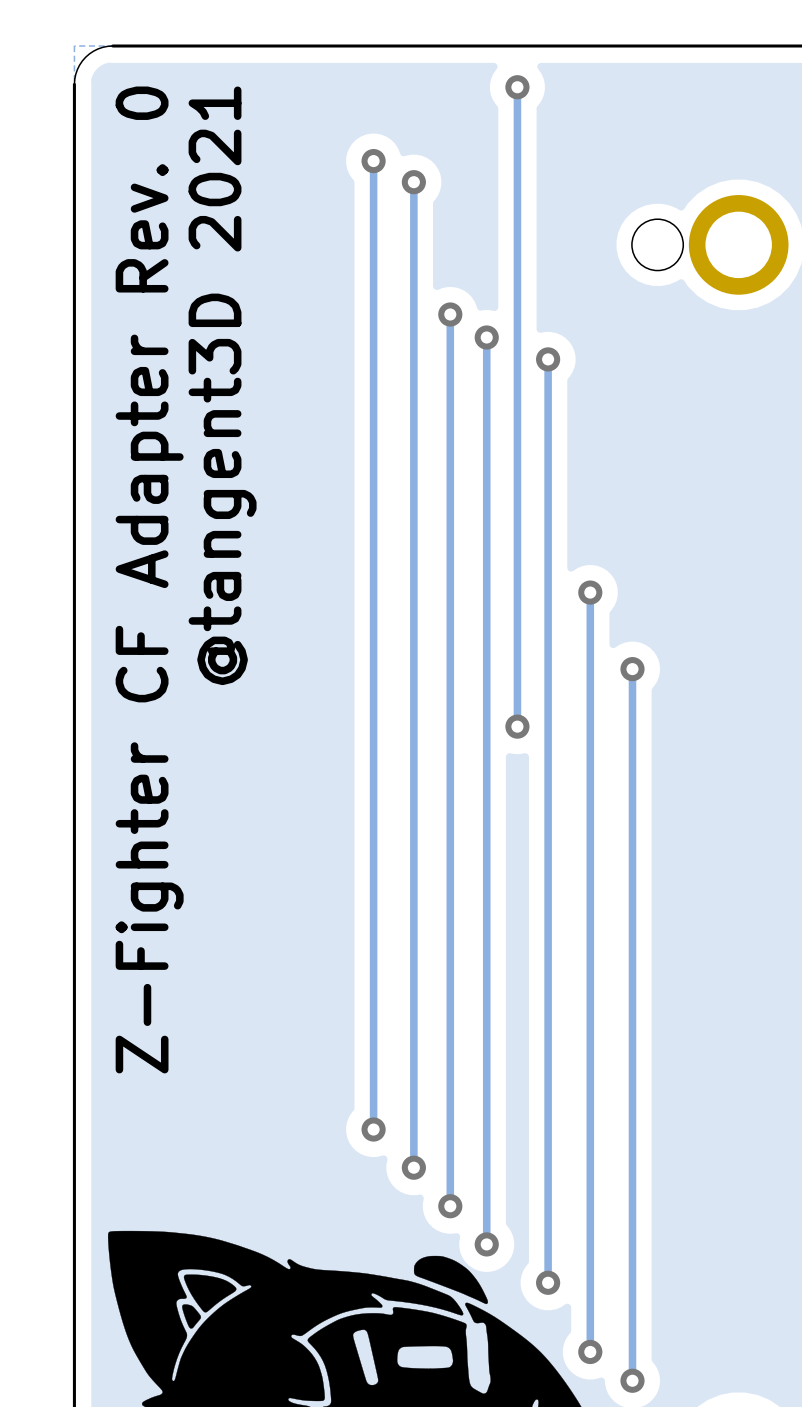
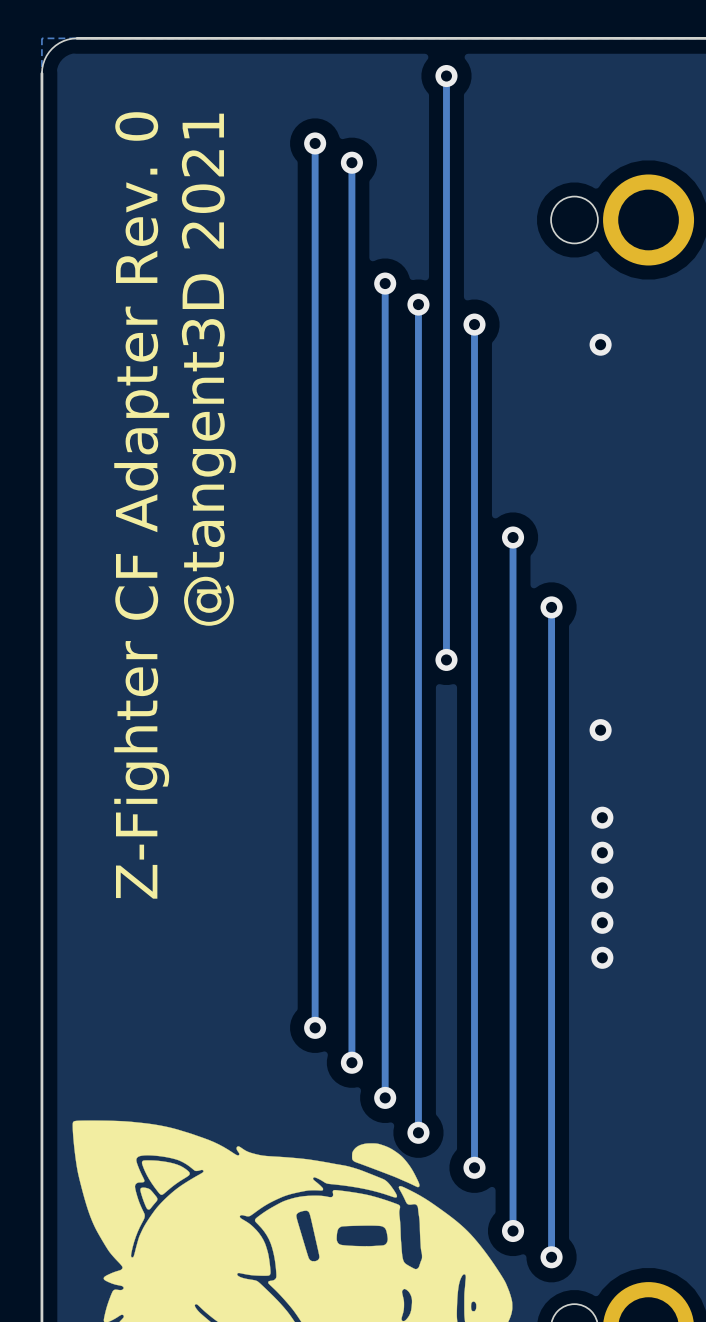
via: none -> (600, 344)
text position: @tangent3D 2021 (222, 385) -> @tangent3D 2021 (208, 369)
text position: Z-Fighter CF Adapter Rev. 0 (149, 579) -> Z-Fighter CF Adapter Rev. 0 (141, 505)
via: none -> (600, 730)
via: none -> (602, 817)
via: none -> (602, 852)
via: none -> (602, 887)
via: none -> (602, 922)
via: none -> (602, 957)

